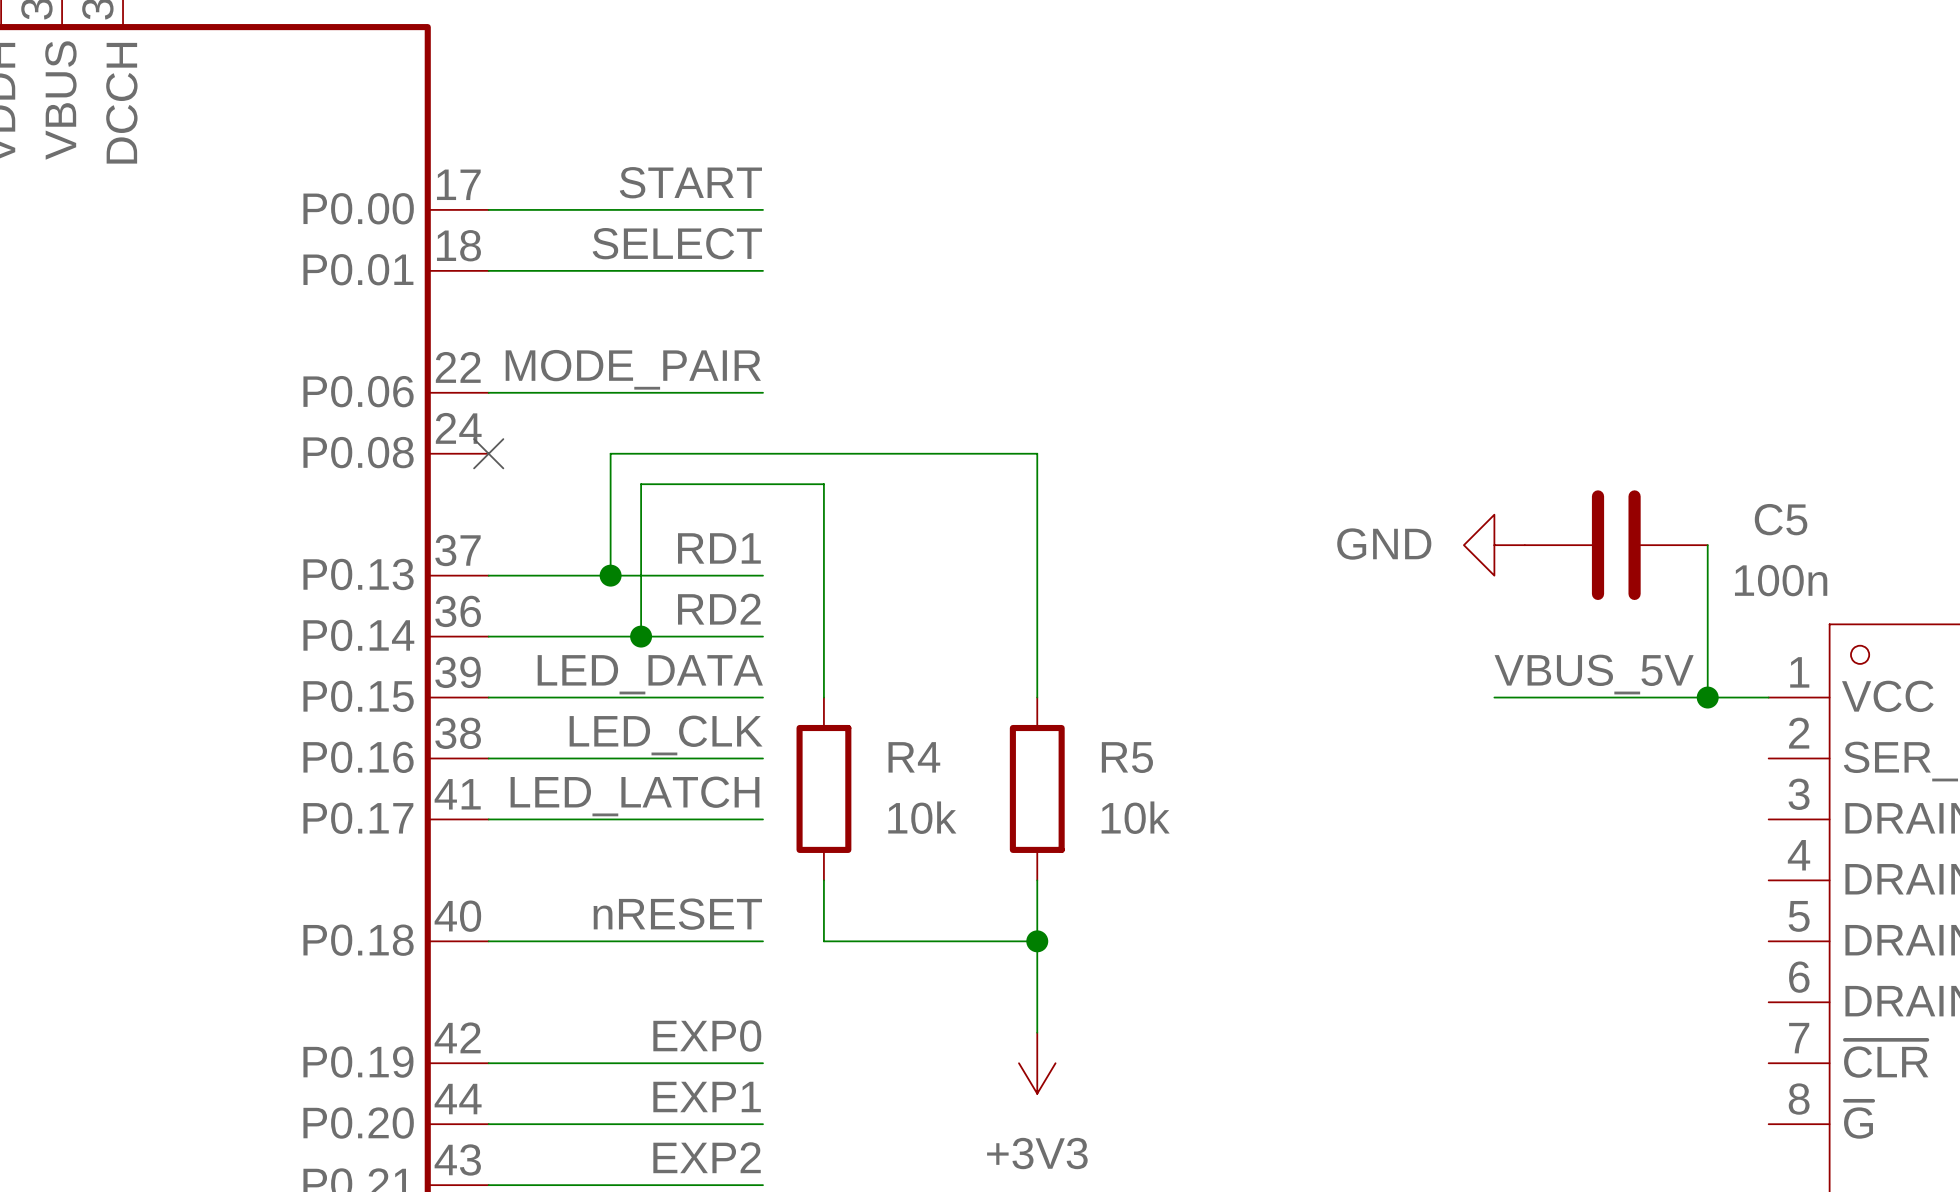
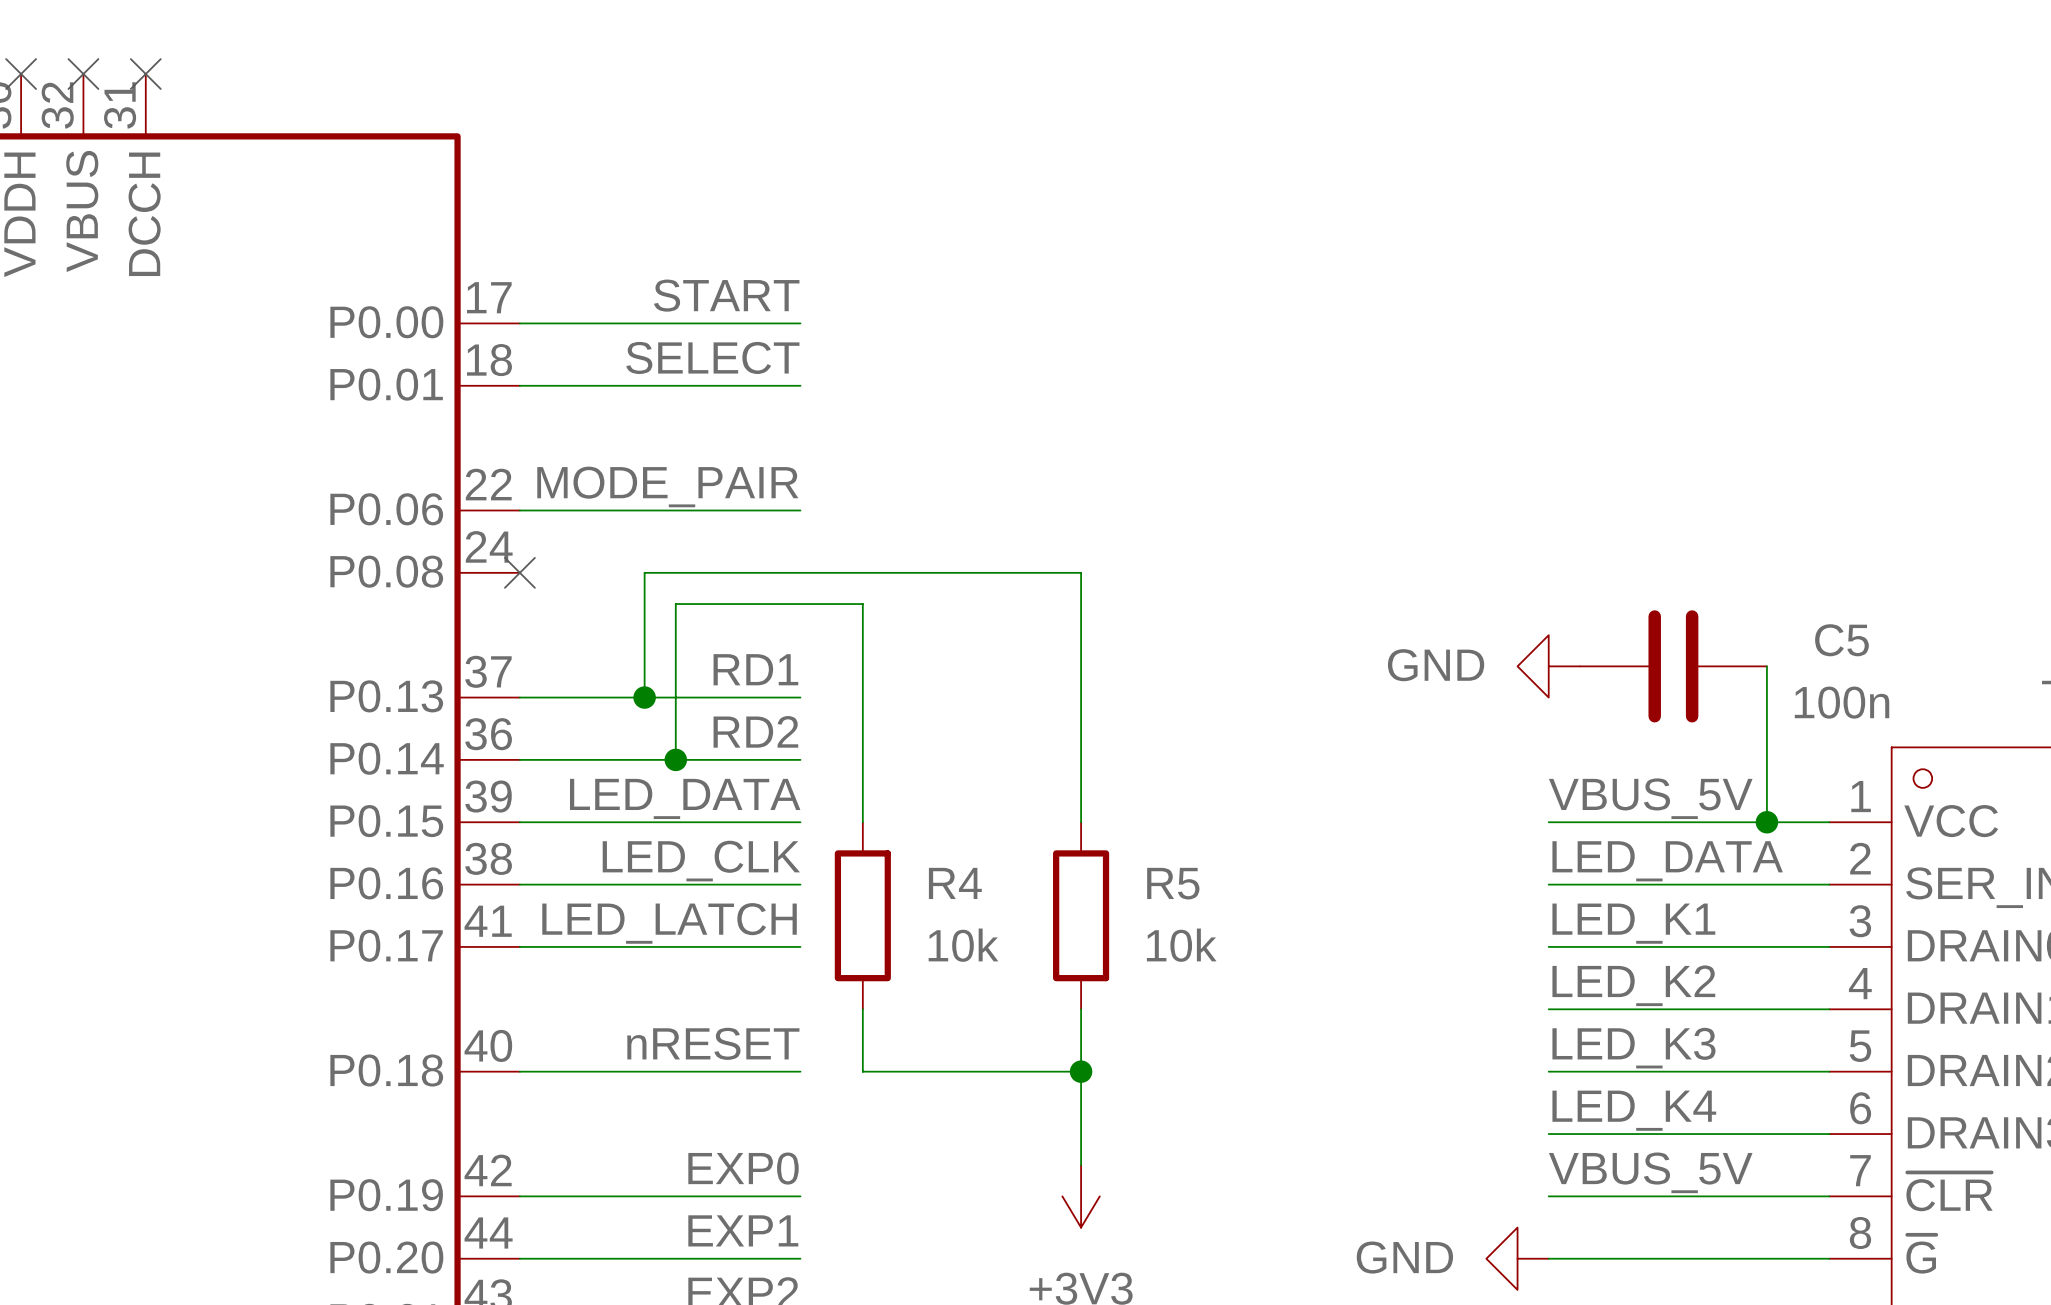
label: none -> LED_DATA (1667, 861)
wire: none -> (1548, 884) (1829, 884)
label: none -> LED_K1 (1633, 923)
wire: none -> (1548, 946) (1829, 946)
label: none -> LED_K2 (1633, 985)
wire: none -> (1548, 1009) (1829, 1009)
label: none -> LED_K3 (1633, 1048)
wire: none -> (1548, 1071) (1829, 1071)
label: none -> LED_K4 (1634, 1110)
wire: none -> (1548, 1134) (1829, 1134)
label: none -> VBUS_5V (1650, 1172)
wire: none -> (1548, 1196) (1829, 1196)
power symbol: none -> GND (1517, 1258)
wire: none -> (1548, 1258) (1829, 1258)

